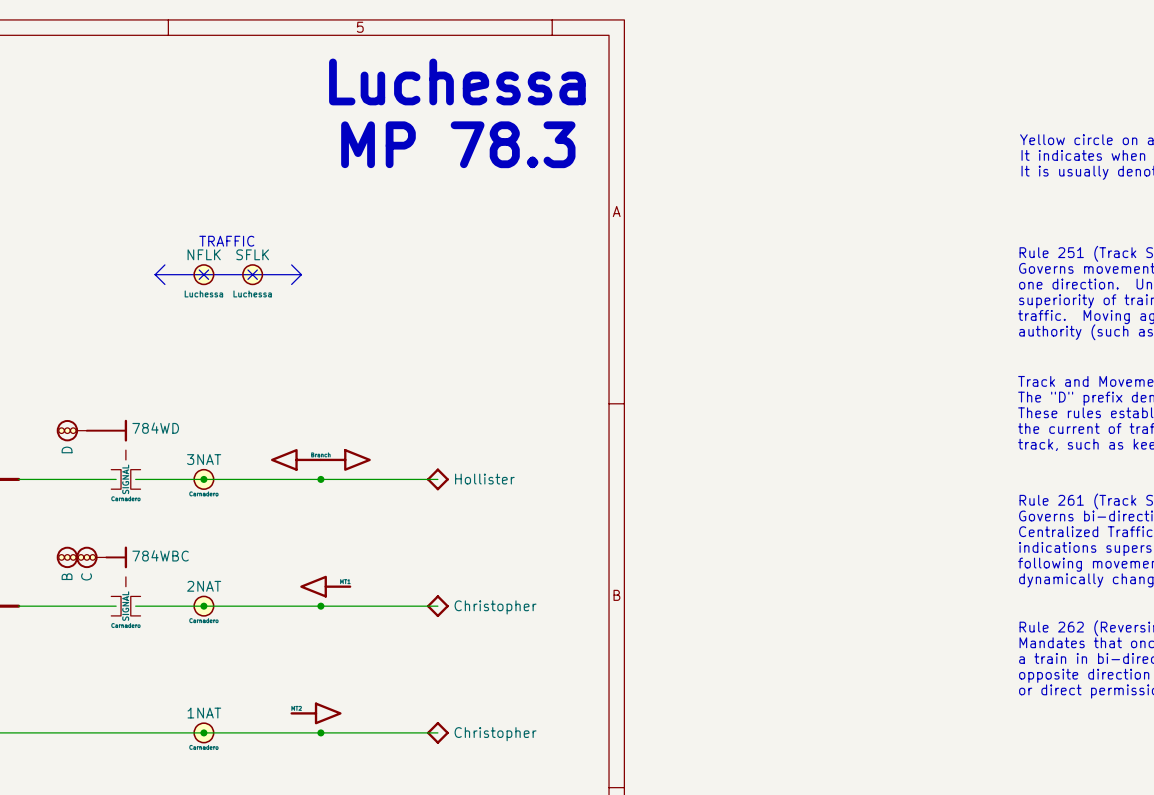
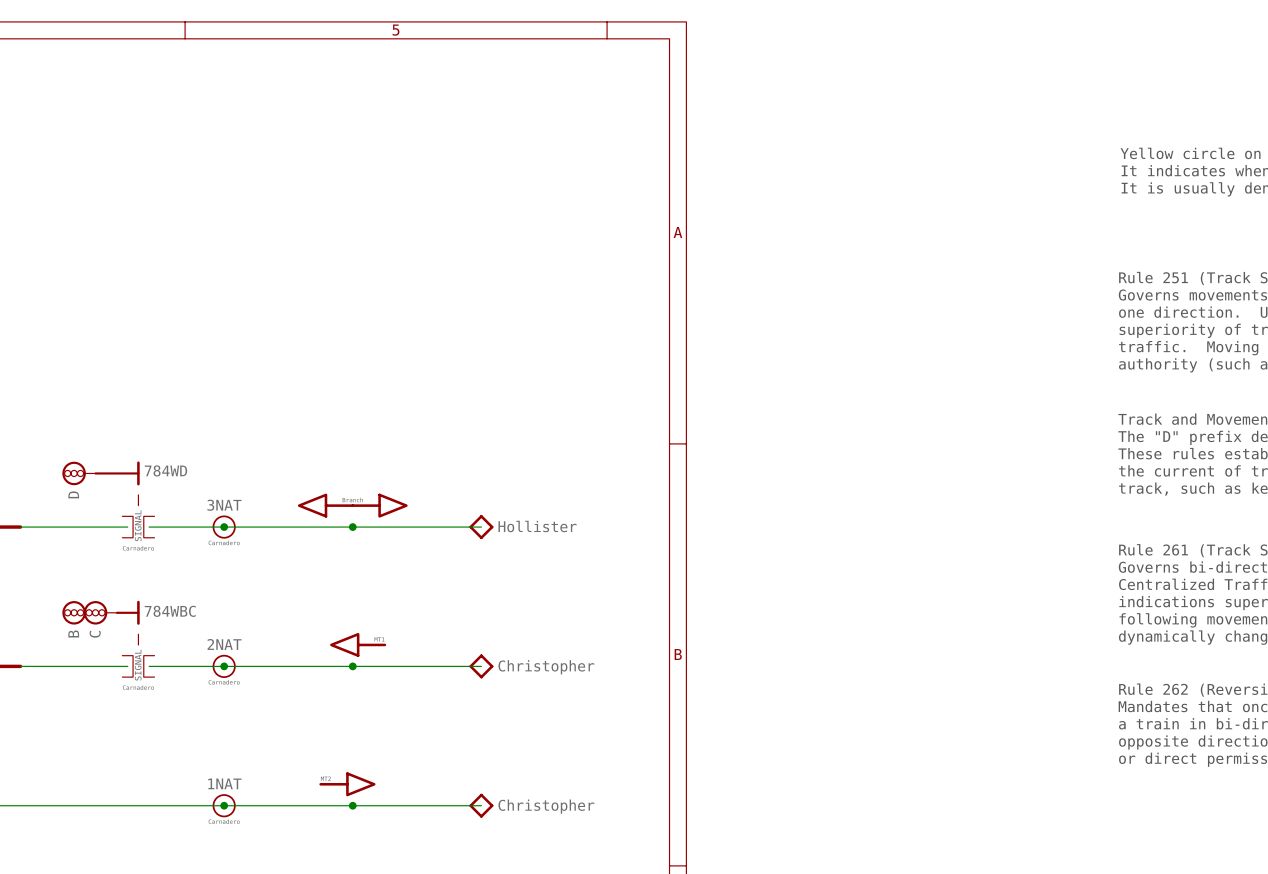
text: Luchessa (457, 81) -> none
text: MP 78.3 (458, 144) -> none
text: TRAFFIC (226, 241) -> none
line: (164, 264) (155, 274) -> none
line: (291, 264) (301, 274) -> none
line: (155, 274) (301, 274) -> none
line: (155, 274) (164, 284) -> none
no-connect mark: (203, 274) -> none
part: NFLK (203, 274) -> none
no-connect mark: (252, 274) -> none
part: SFLK (252, 274) -> none
line: (301, 274) (291, 284) -> none

